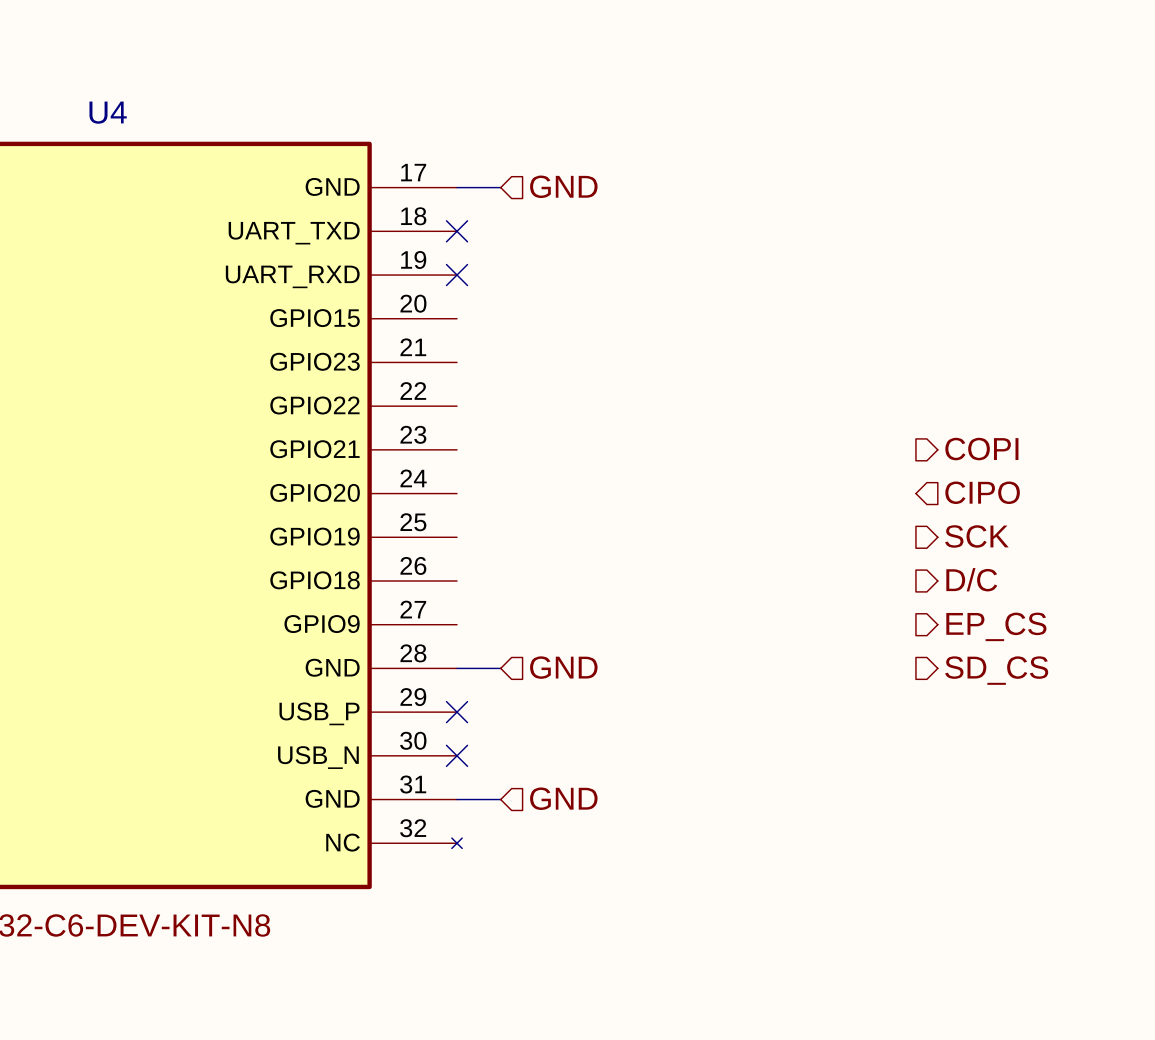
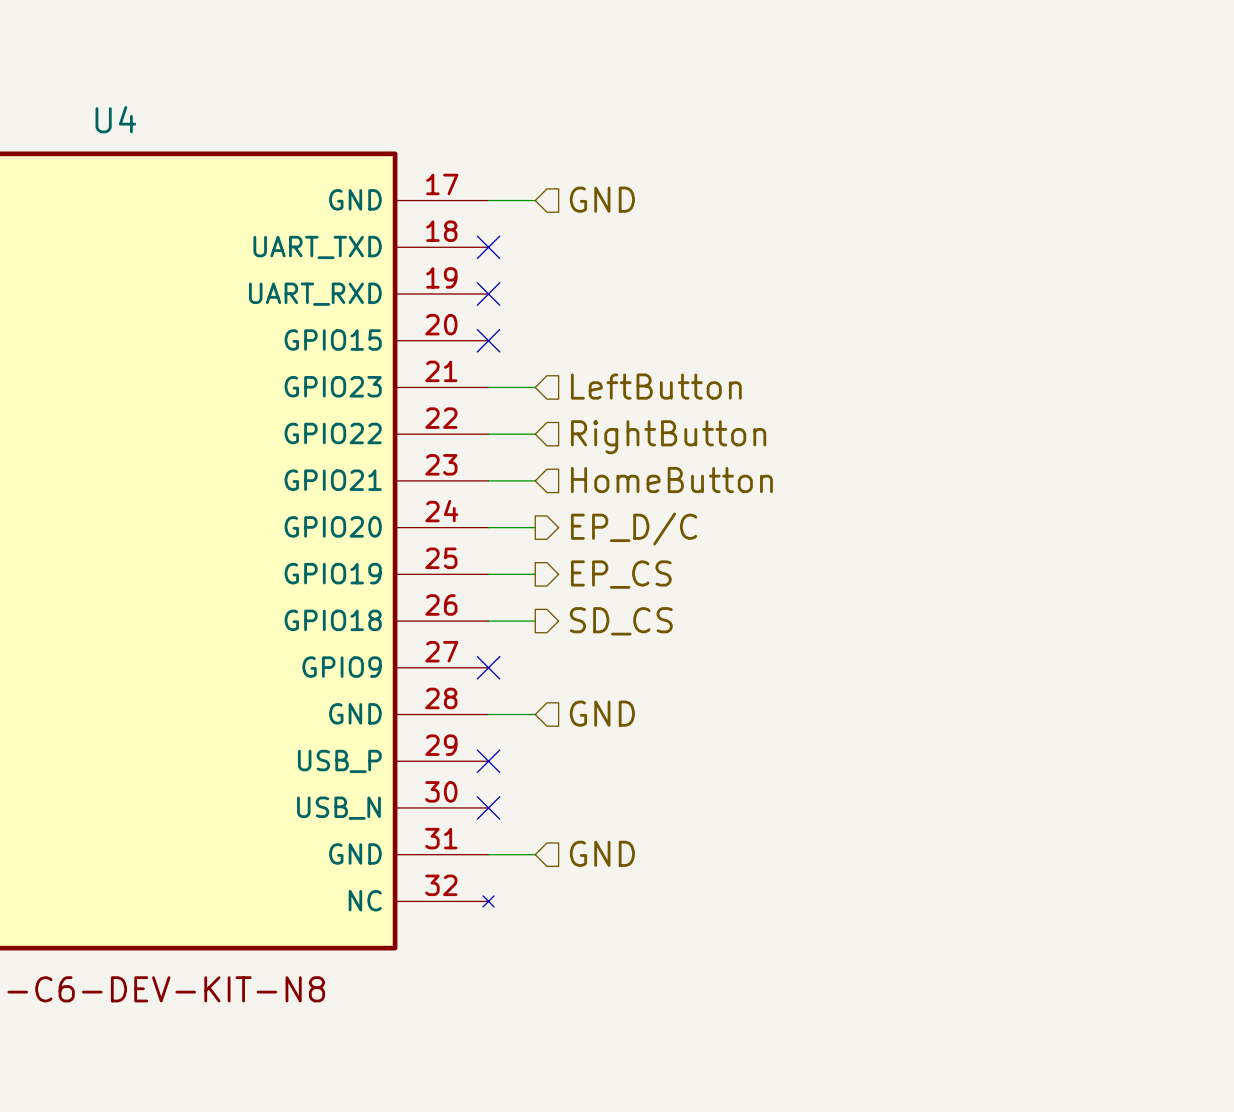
no-connect mark: none -> (488, 340)
hierarchical label: none -> LeftButton (656, 386)
wire: none -> (488, 387) (535, 387)
wire: none -> (488, 434) (535, 434)
hierarchical label: none -> RightButton (668, 437)
wire: none -> (488, 480) (535, 480)
hierarchical label: none -> HomeButton (671, 480)
hierarchical label: COPI (981, 449) -> none
hierarchical label: CIPO (982, 492) -> none
wire: none -> (488, 527) (535, 527)
hierarchical label: none -> EP_D/C (634, 528)
hierarchical label: SCK (976, 536) -> none
wire: none -> (488, 574) (535, 574)
hierarchical label: D/C (971, 579) -> none
wire: none -> (488, 621) (535, 621)
no-connect mark: none -> (488, 667)
hierarchical label position: EP_CS (996, 626) -> EP_CS (621, 574)
hierarchical label position: SD_CS (996, 670) -> SD_CS (621, 621)

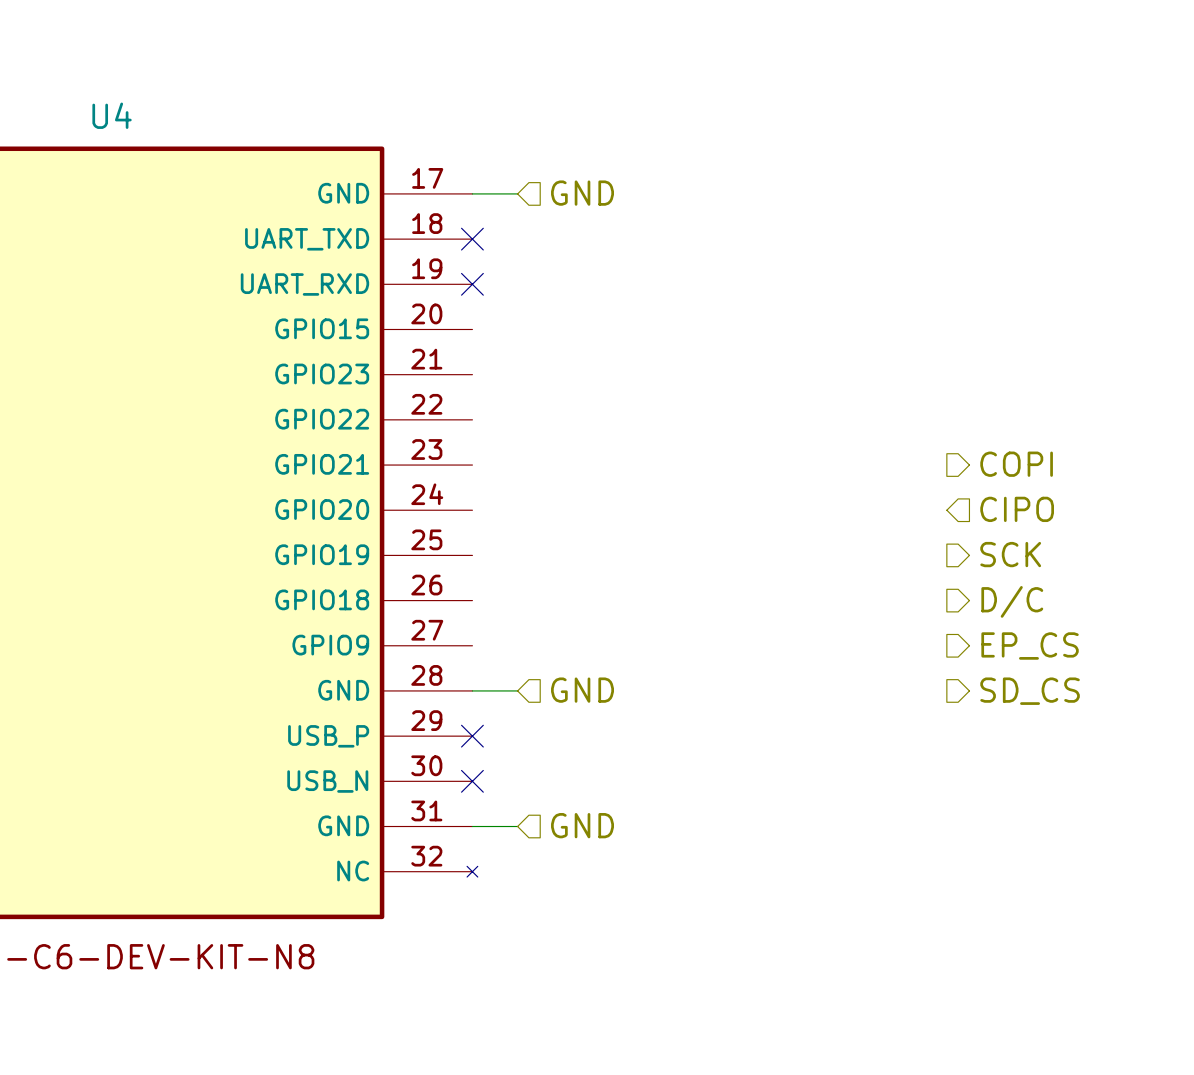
no-connect mark: (488, 340) -> none
hierarchical label: LeftButton (656, 386) -> none
wire: (488, 387) (535, 387) -> none
wire: (488, 434) (535, 434) -> none
hierarchical label: RightButton (668, 437) -> none
wire: (488, 480) (535, 480) -> none
hierarchical label: HomeButton (671, 480) -> none
hierarchical label: none -> COPI (1016, 464)
hierarchical label: none -> CIPO (1017, 509)
wire: (488, 527) (535, 527) -> none
hierarchical label: EP_D/C (634, 528) -> none
hierarchical label: none -> SCK (1010, 554)
wire: (488, 574) (535, 574) -> none
hierarchical label position: EP_CS (621, 574) -> EP_CS (1030, 646)
wire: (488, 621) (535, 621) -> none
hierarchical label position: SD_CS (621, 621) -> SD_CS (1030, 691)
hierarchical label: none -> D/C (1012, 601)
no-connect mark: (488, 667) -> none

